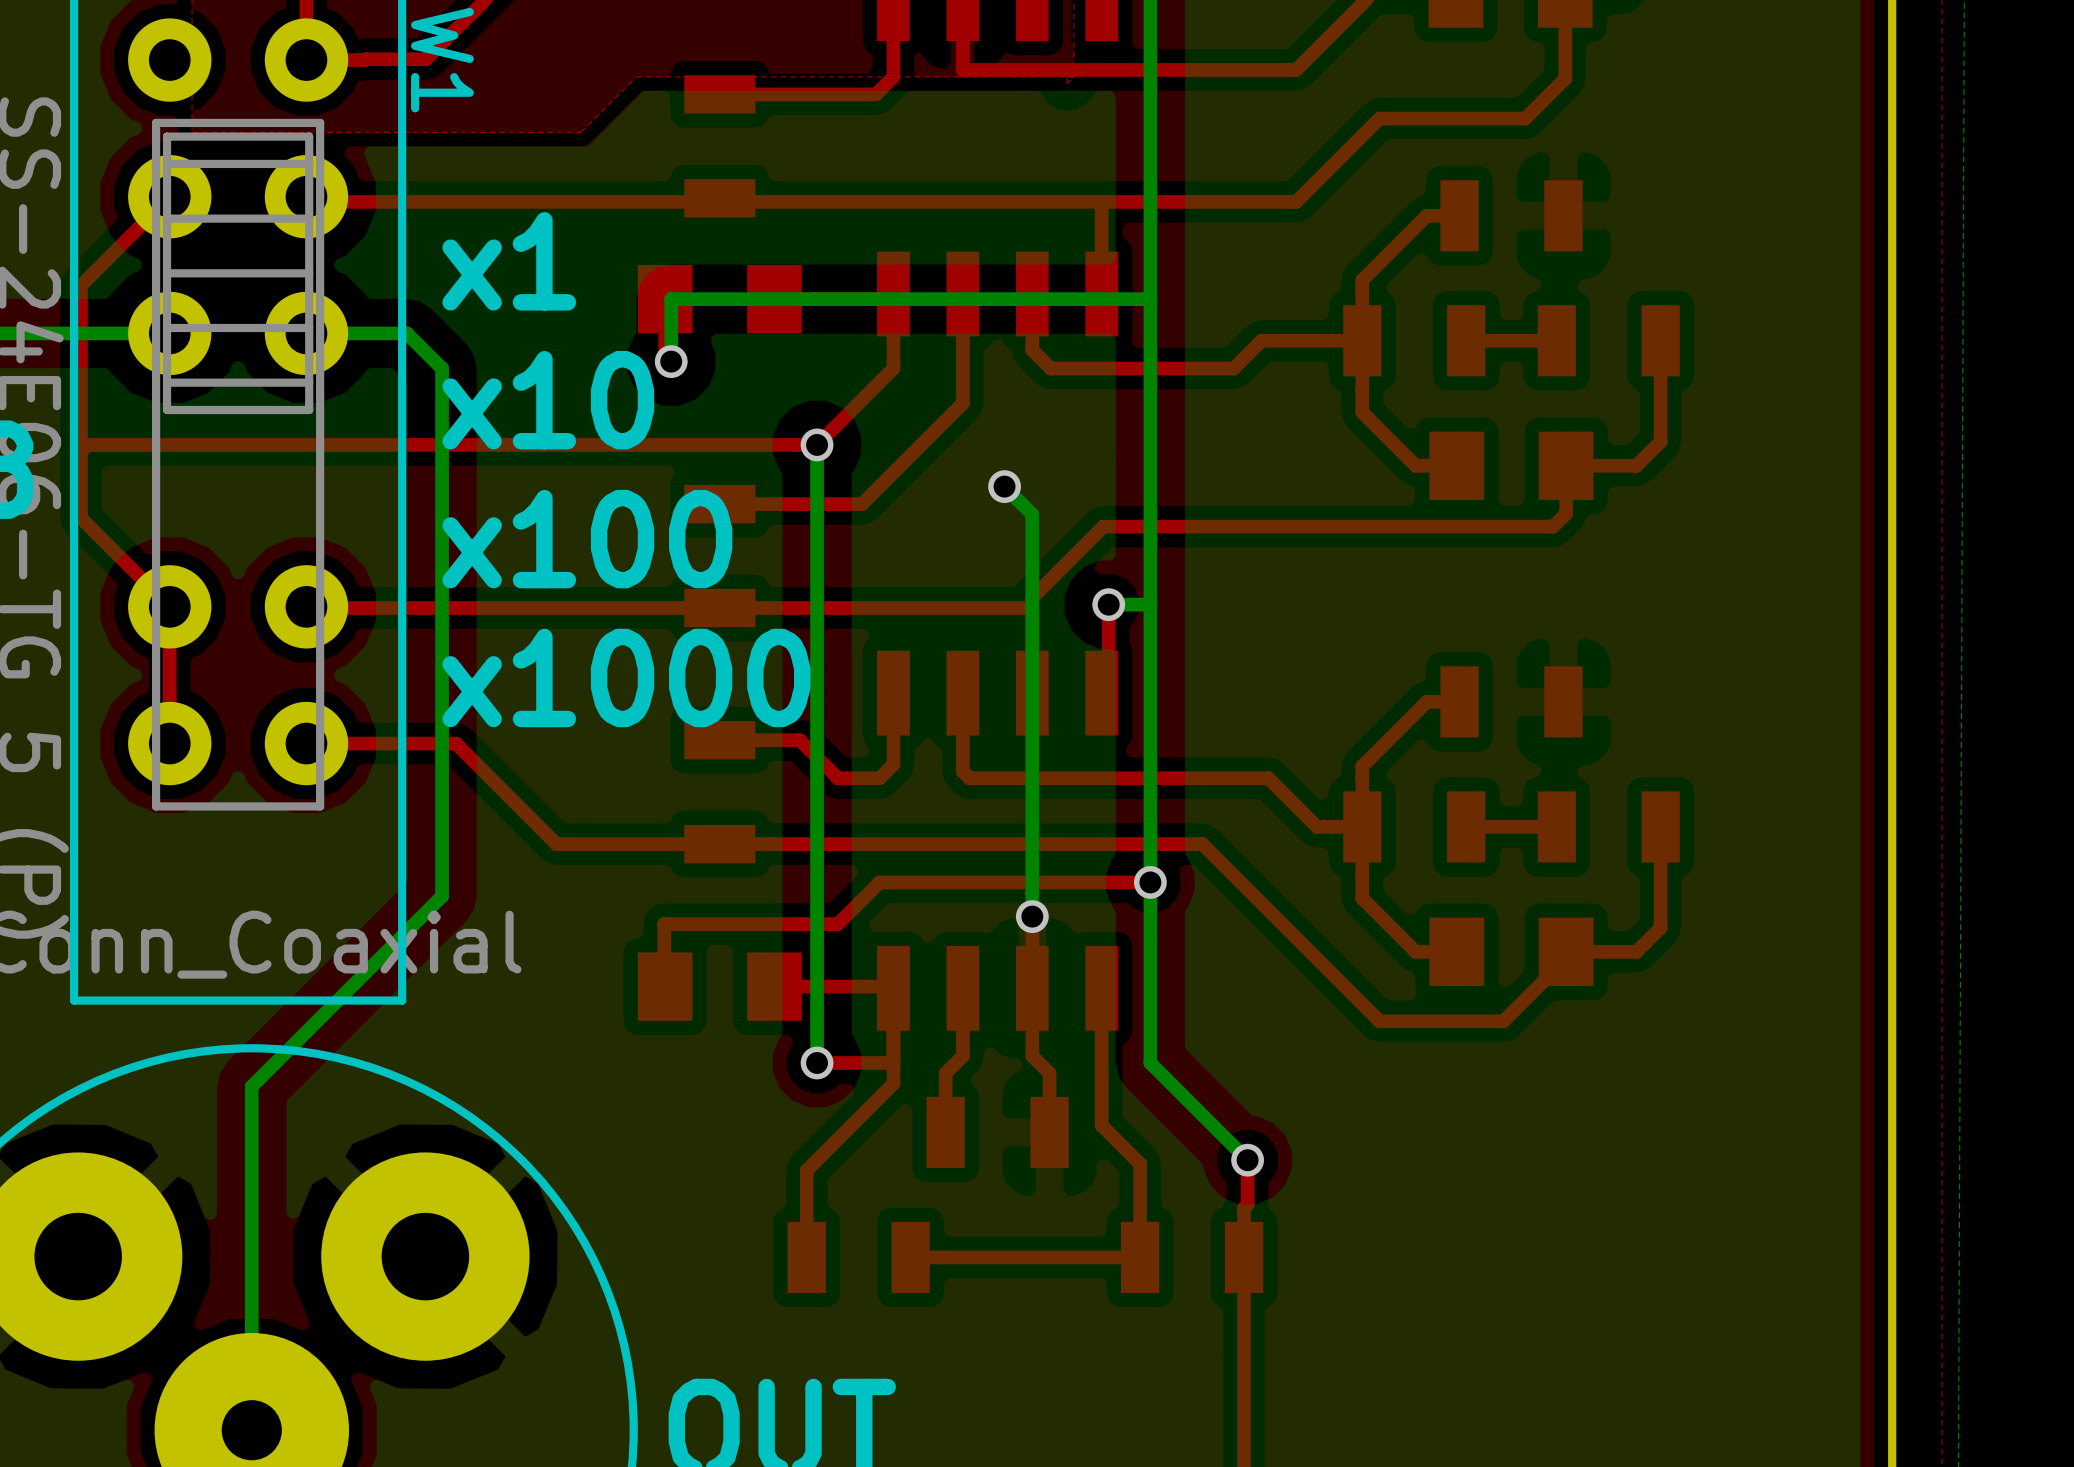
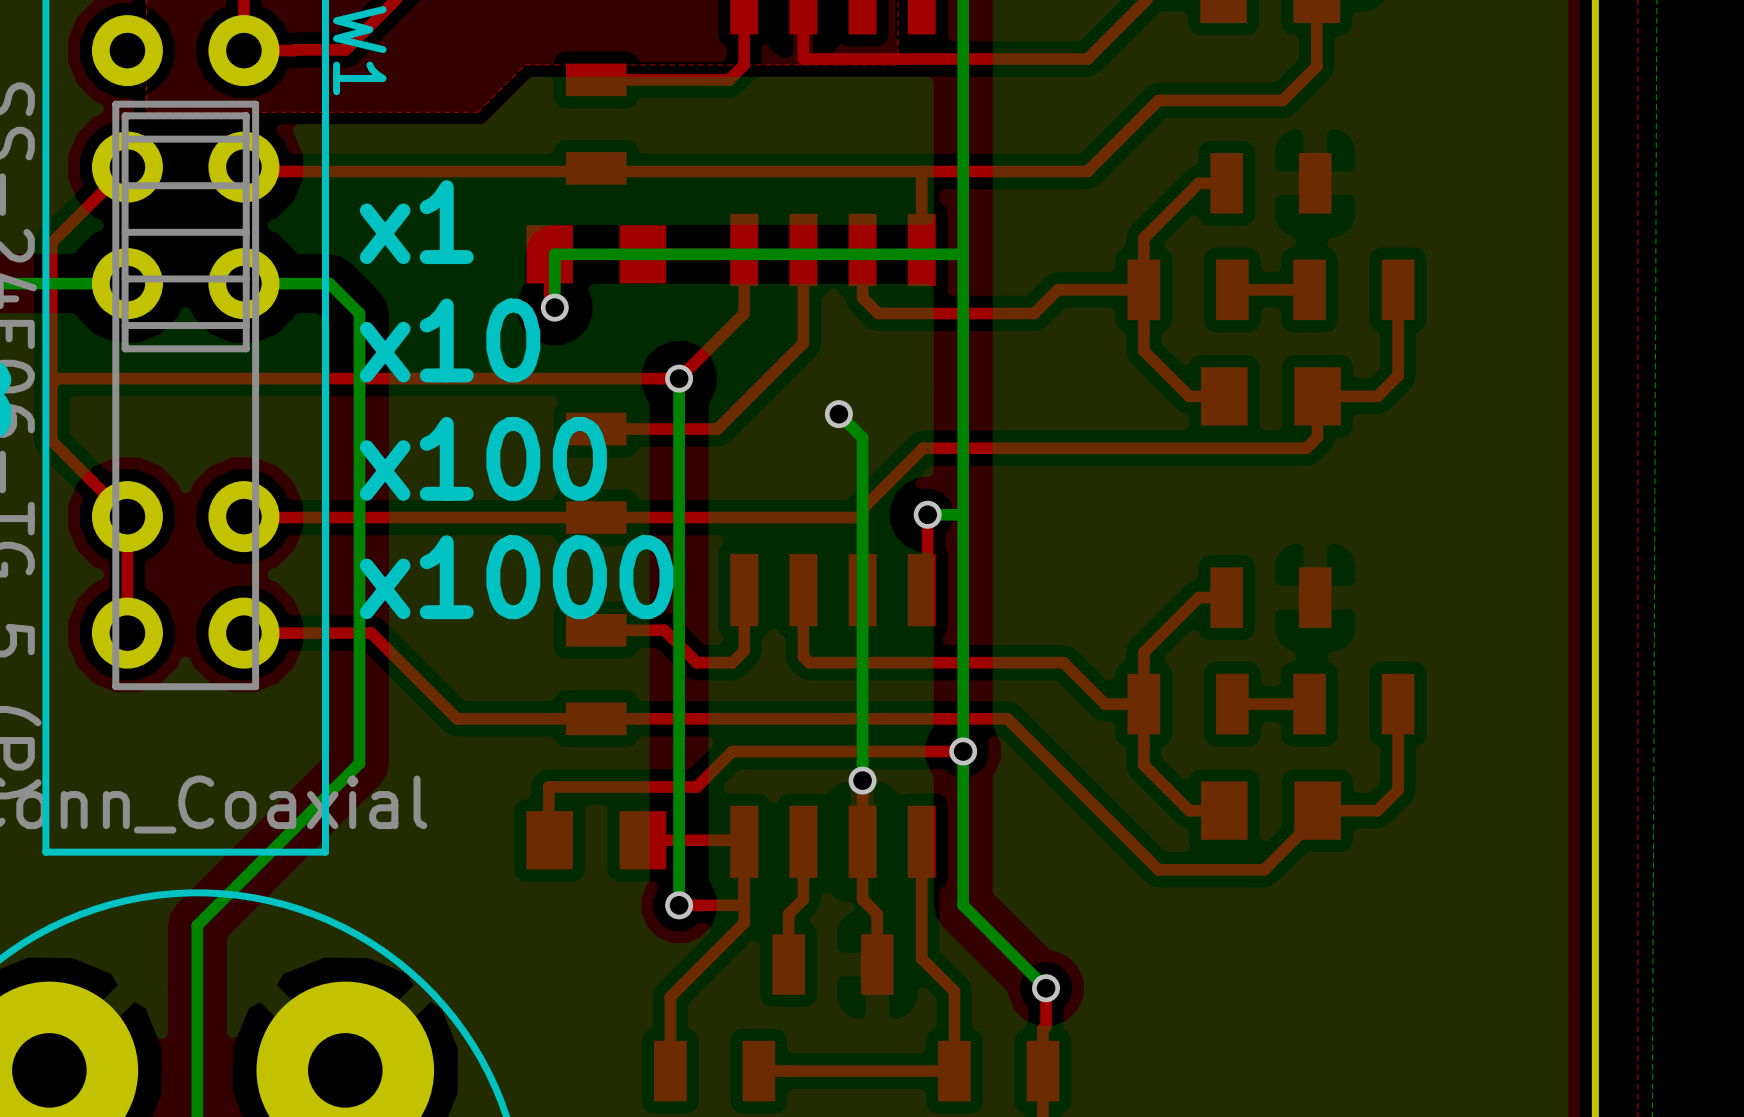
top zone outline: (1074, 76) (1067, 83) (1067, 76) -> none

